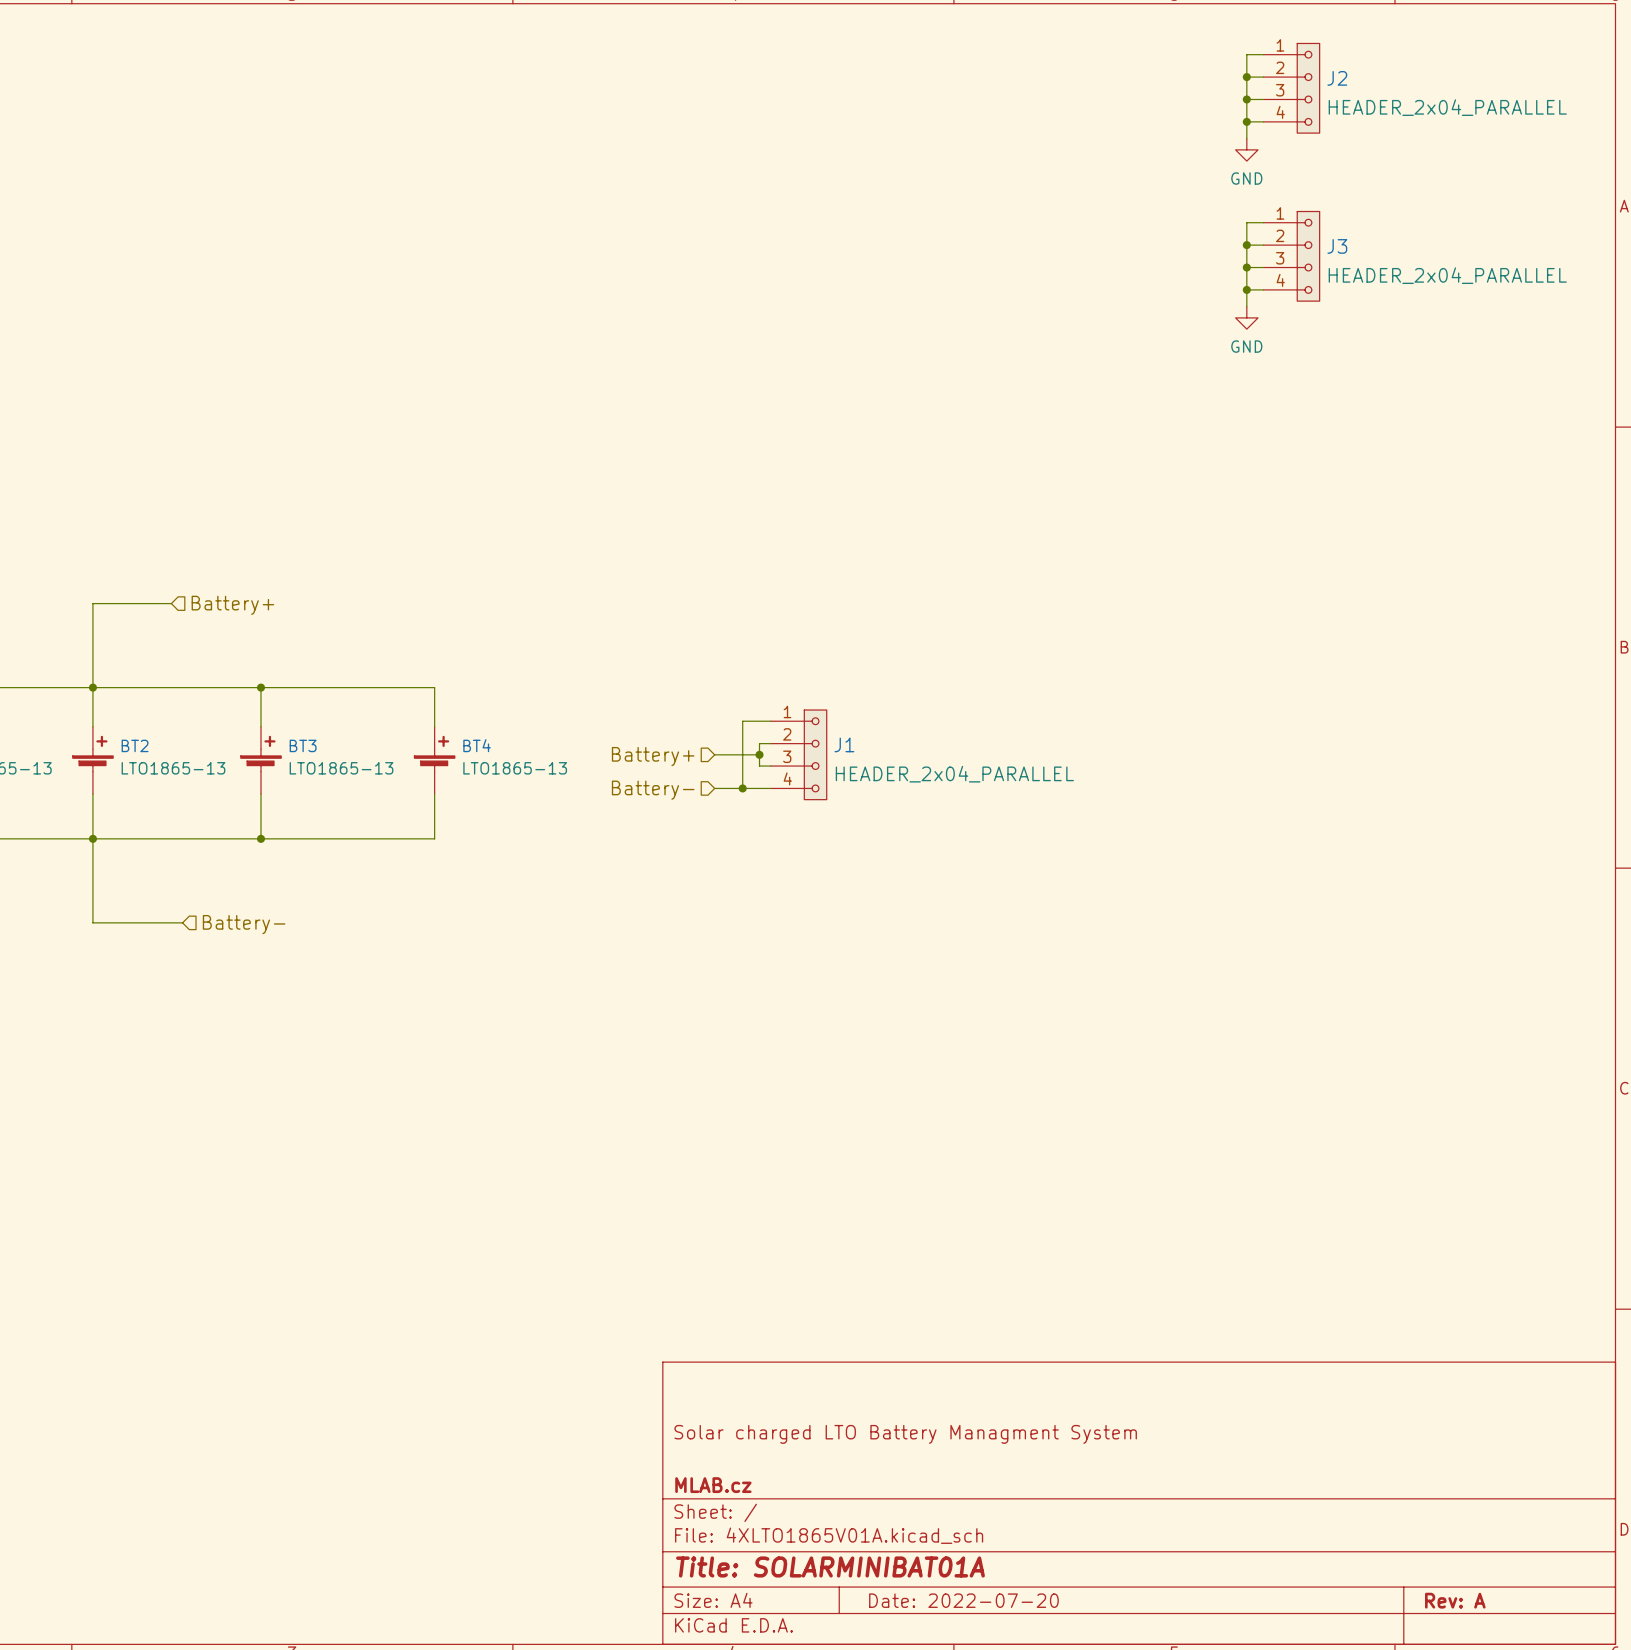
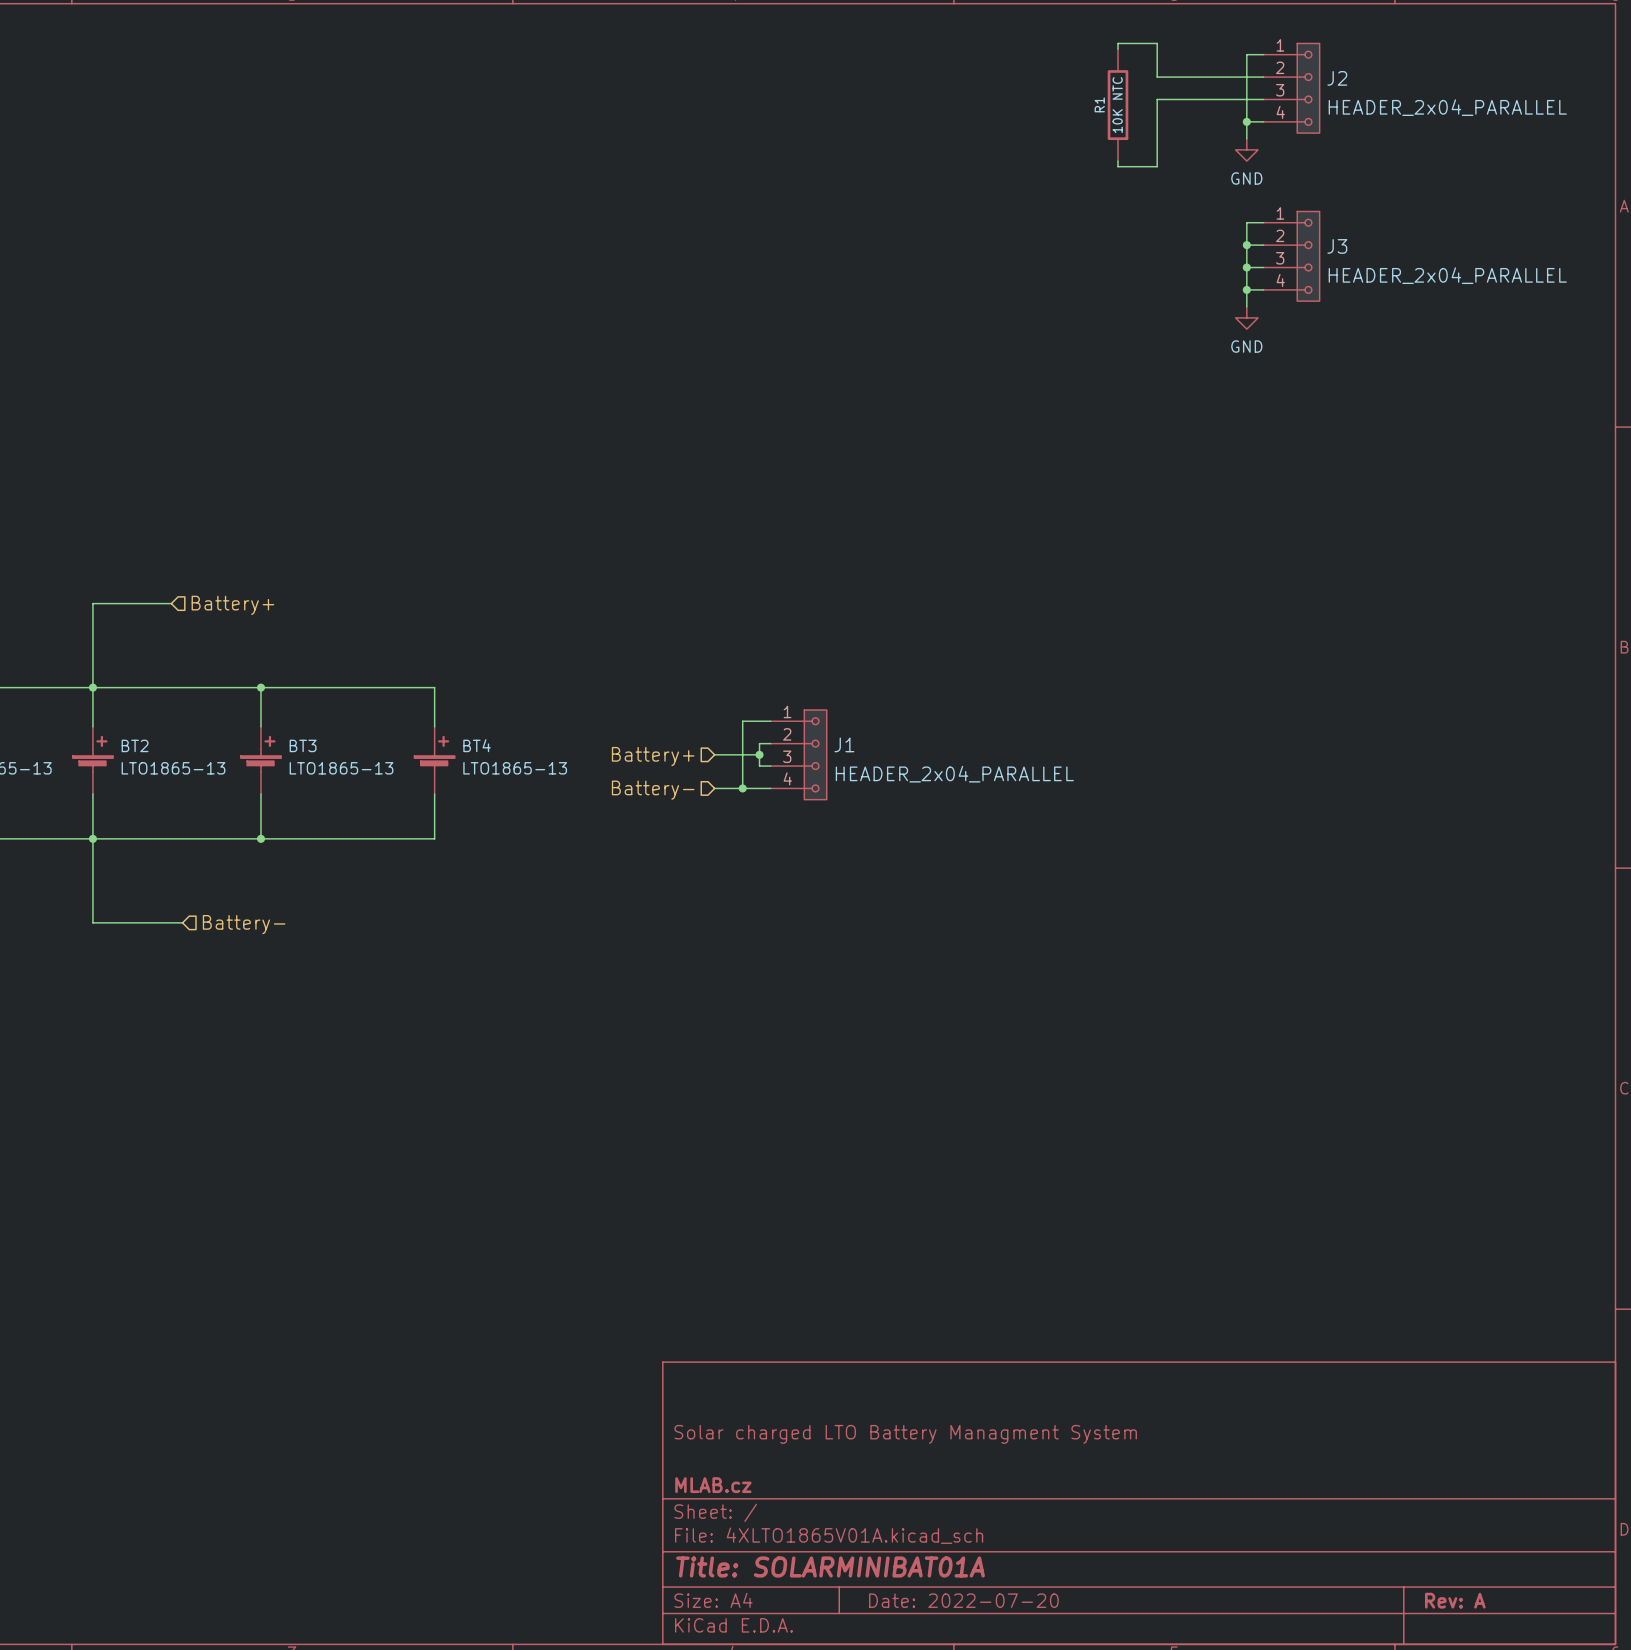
wire: none -> (1117, 49) (1117, 43) (1157, 43) (1157, 77) (1246, 77)
junction: (1246, 77) -> none
wire: none -> (1246, 99) (1157, 99) (1157, 166) (1117, 166) (1117, 161)
junction: (1246, 99) -> none
R1: none -> 10K NTC (1117, 105)

